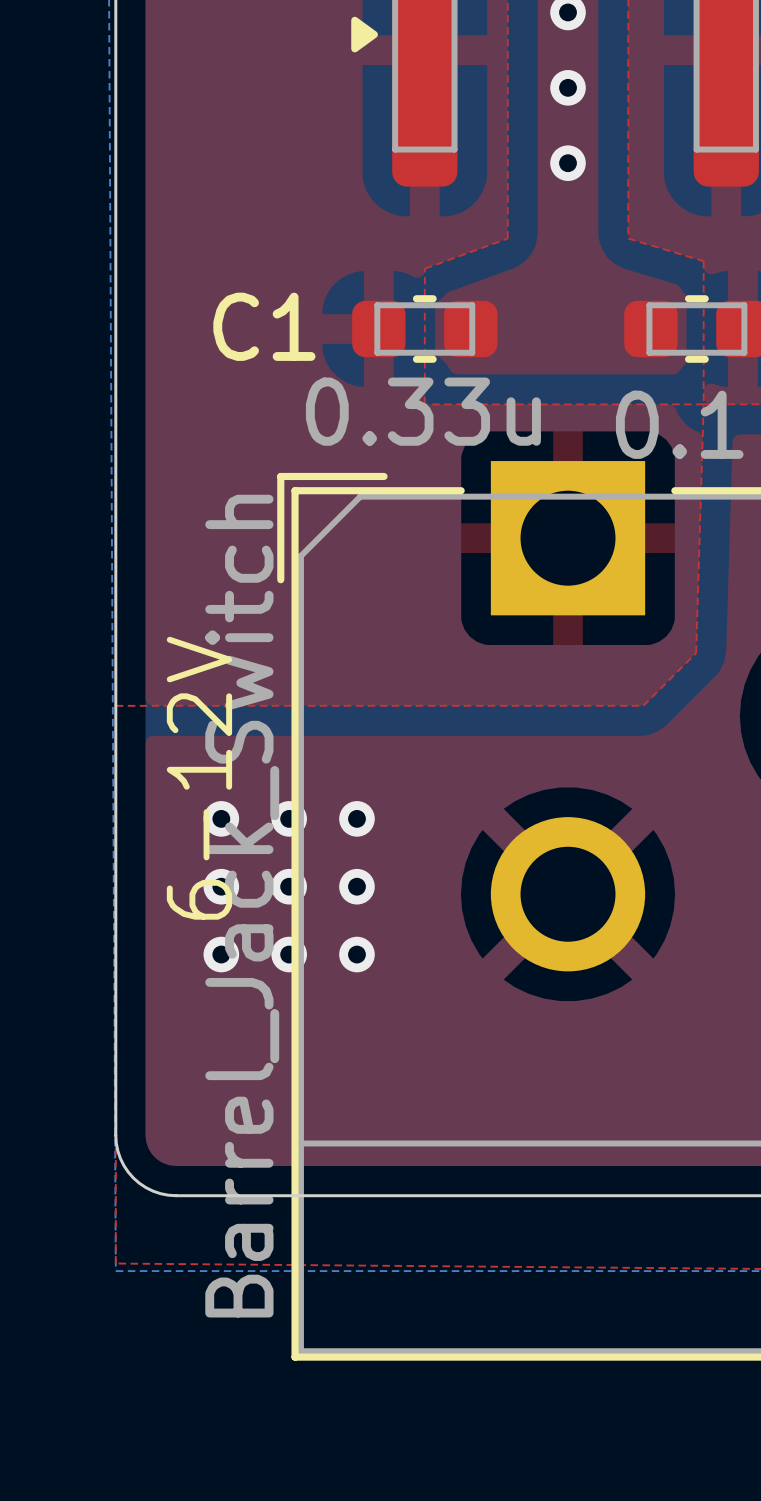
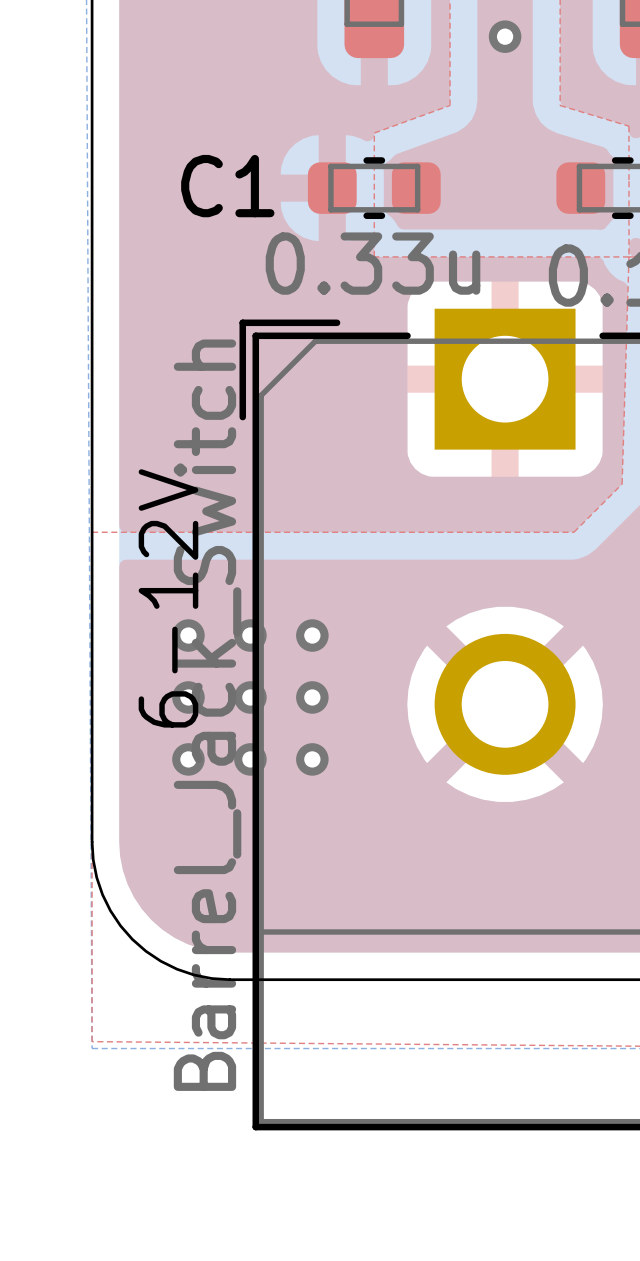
board edge: (115, 1044) (116, 1143) (120, 1158) (133, 1178) (153, 1191) (168, 1195) (266, 1195) -> (92, 842) (96, 877) (102, 894) (120, 925) (132, 939) (145, 951) (177, 969) (194, 975) (229, 979)

